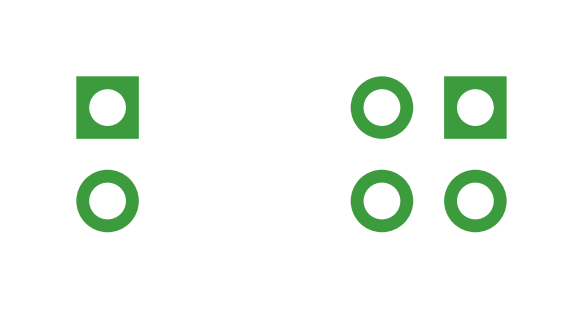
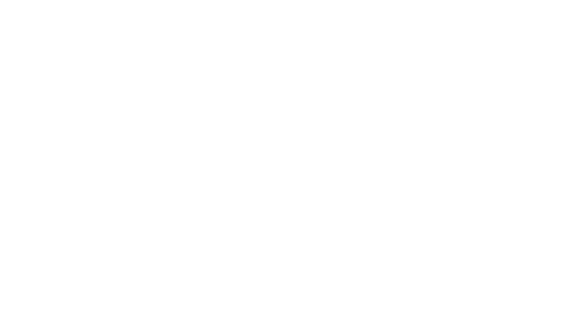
part: (107, 154) -> none
part: (428, 154) -> none

